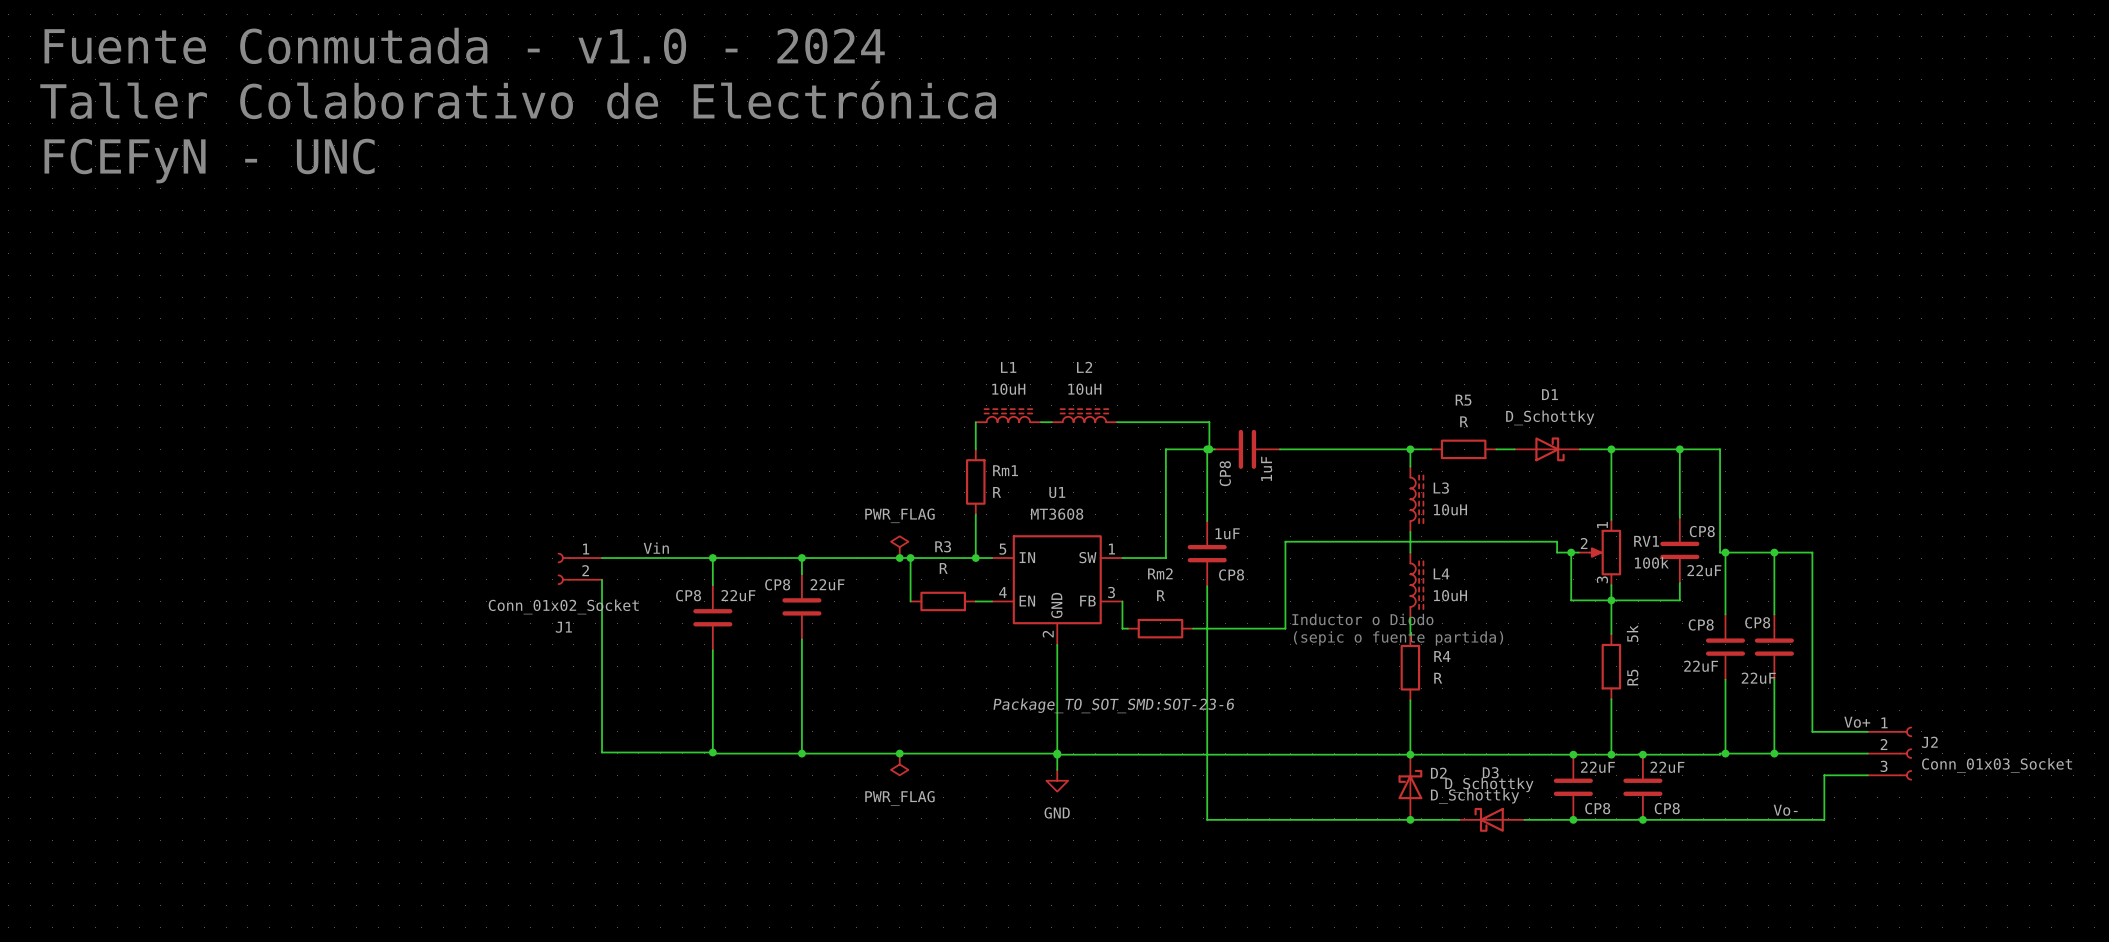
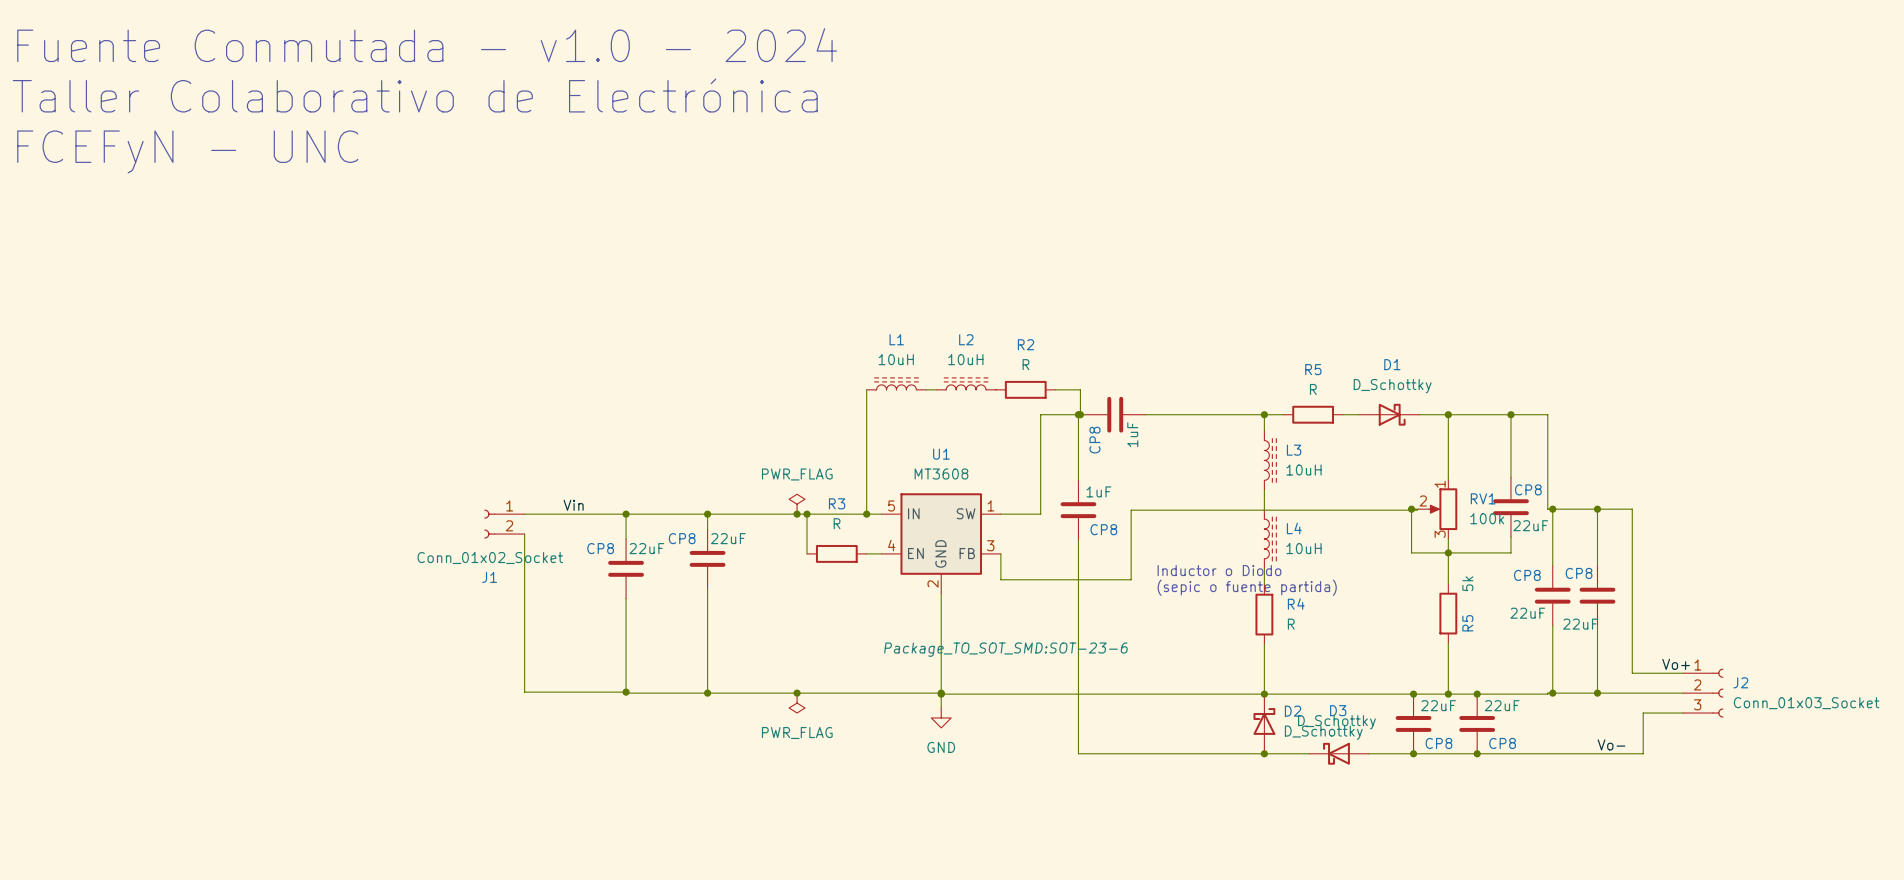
wire: (1117, 422) (1182, 422) -> none
R2: none -> R (1025, 389)
wire: none -> (866, 414) (866, 474)
Rm1: R (975, 481) -> none
wire: (1571, 552) (1557, 552) (1557, 541) (1285, 541) (1285, 628) (1193, 628) -> none
wire: (1122, 628) (1127, 628) -> (1000, 578) (1131, 579) (1131, 510) (1417, 510)
Rm2: R (1160, 628) -> none

